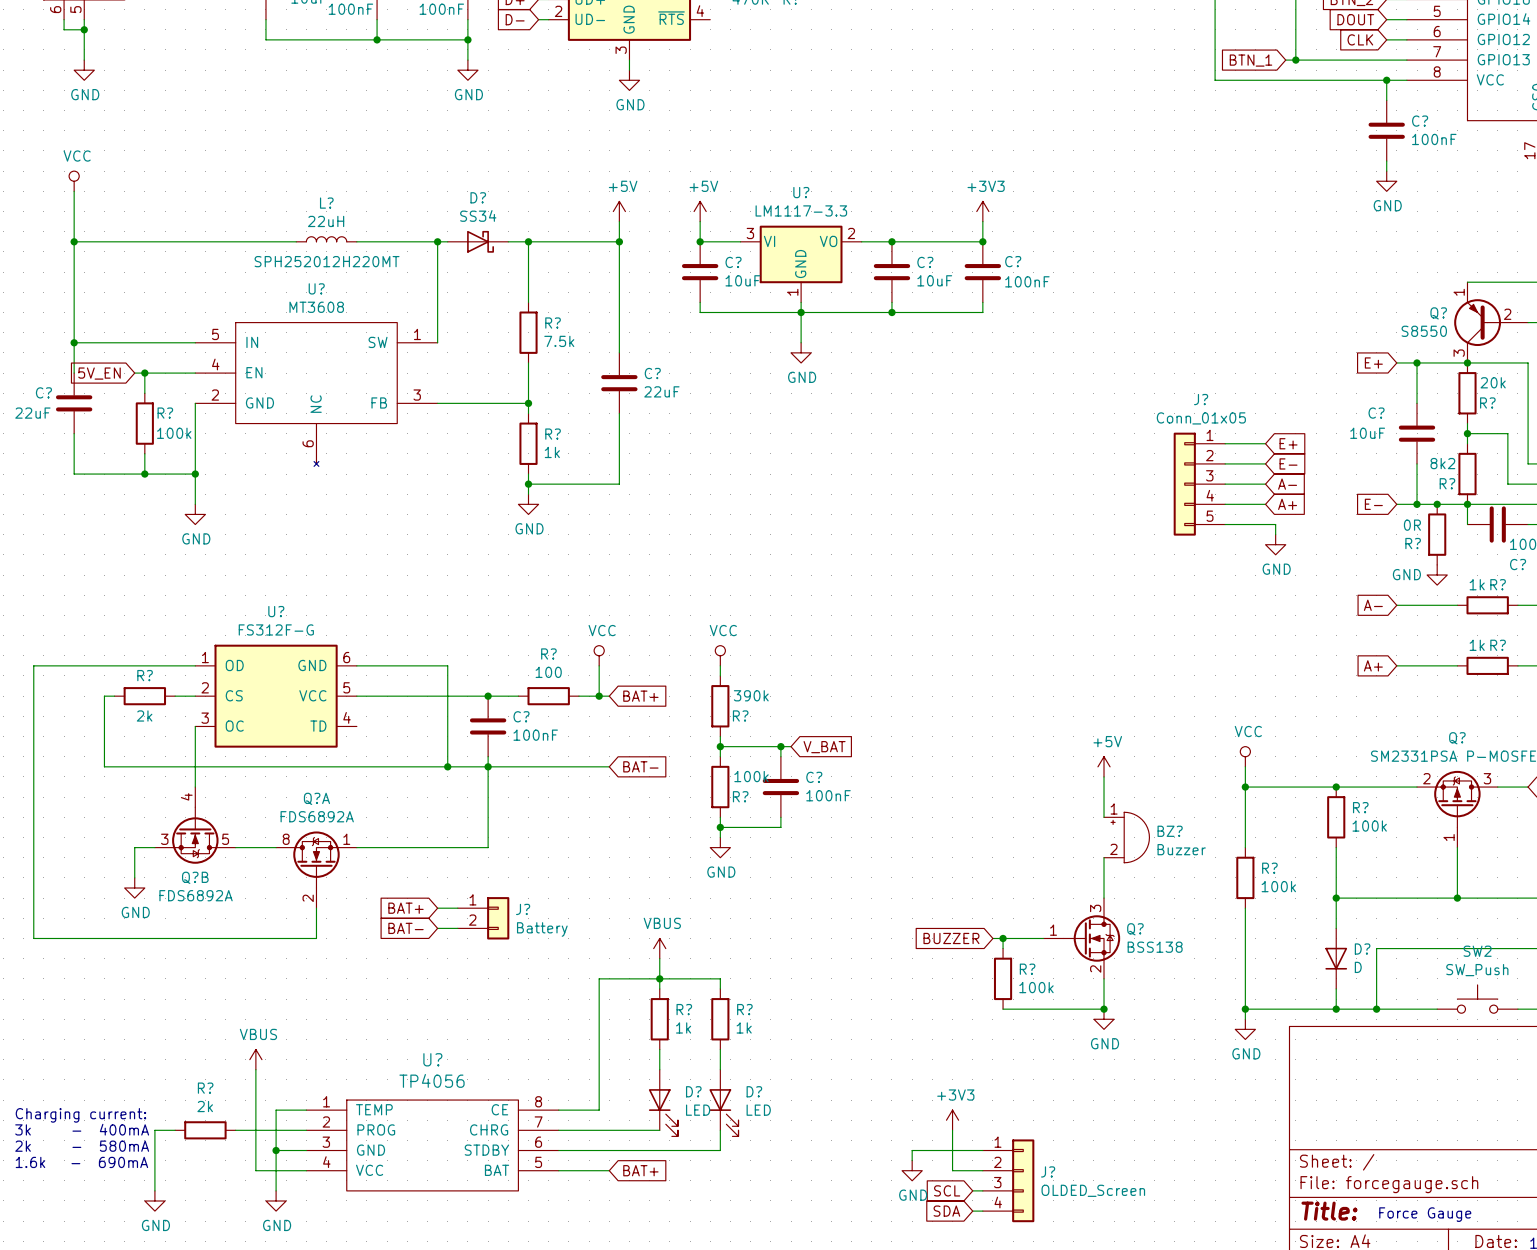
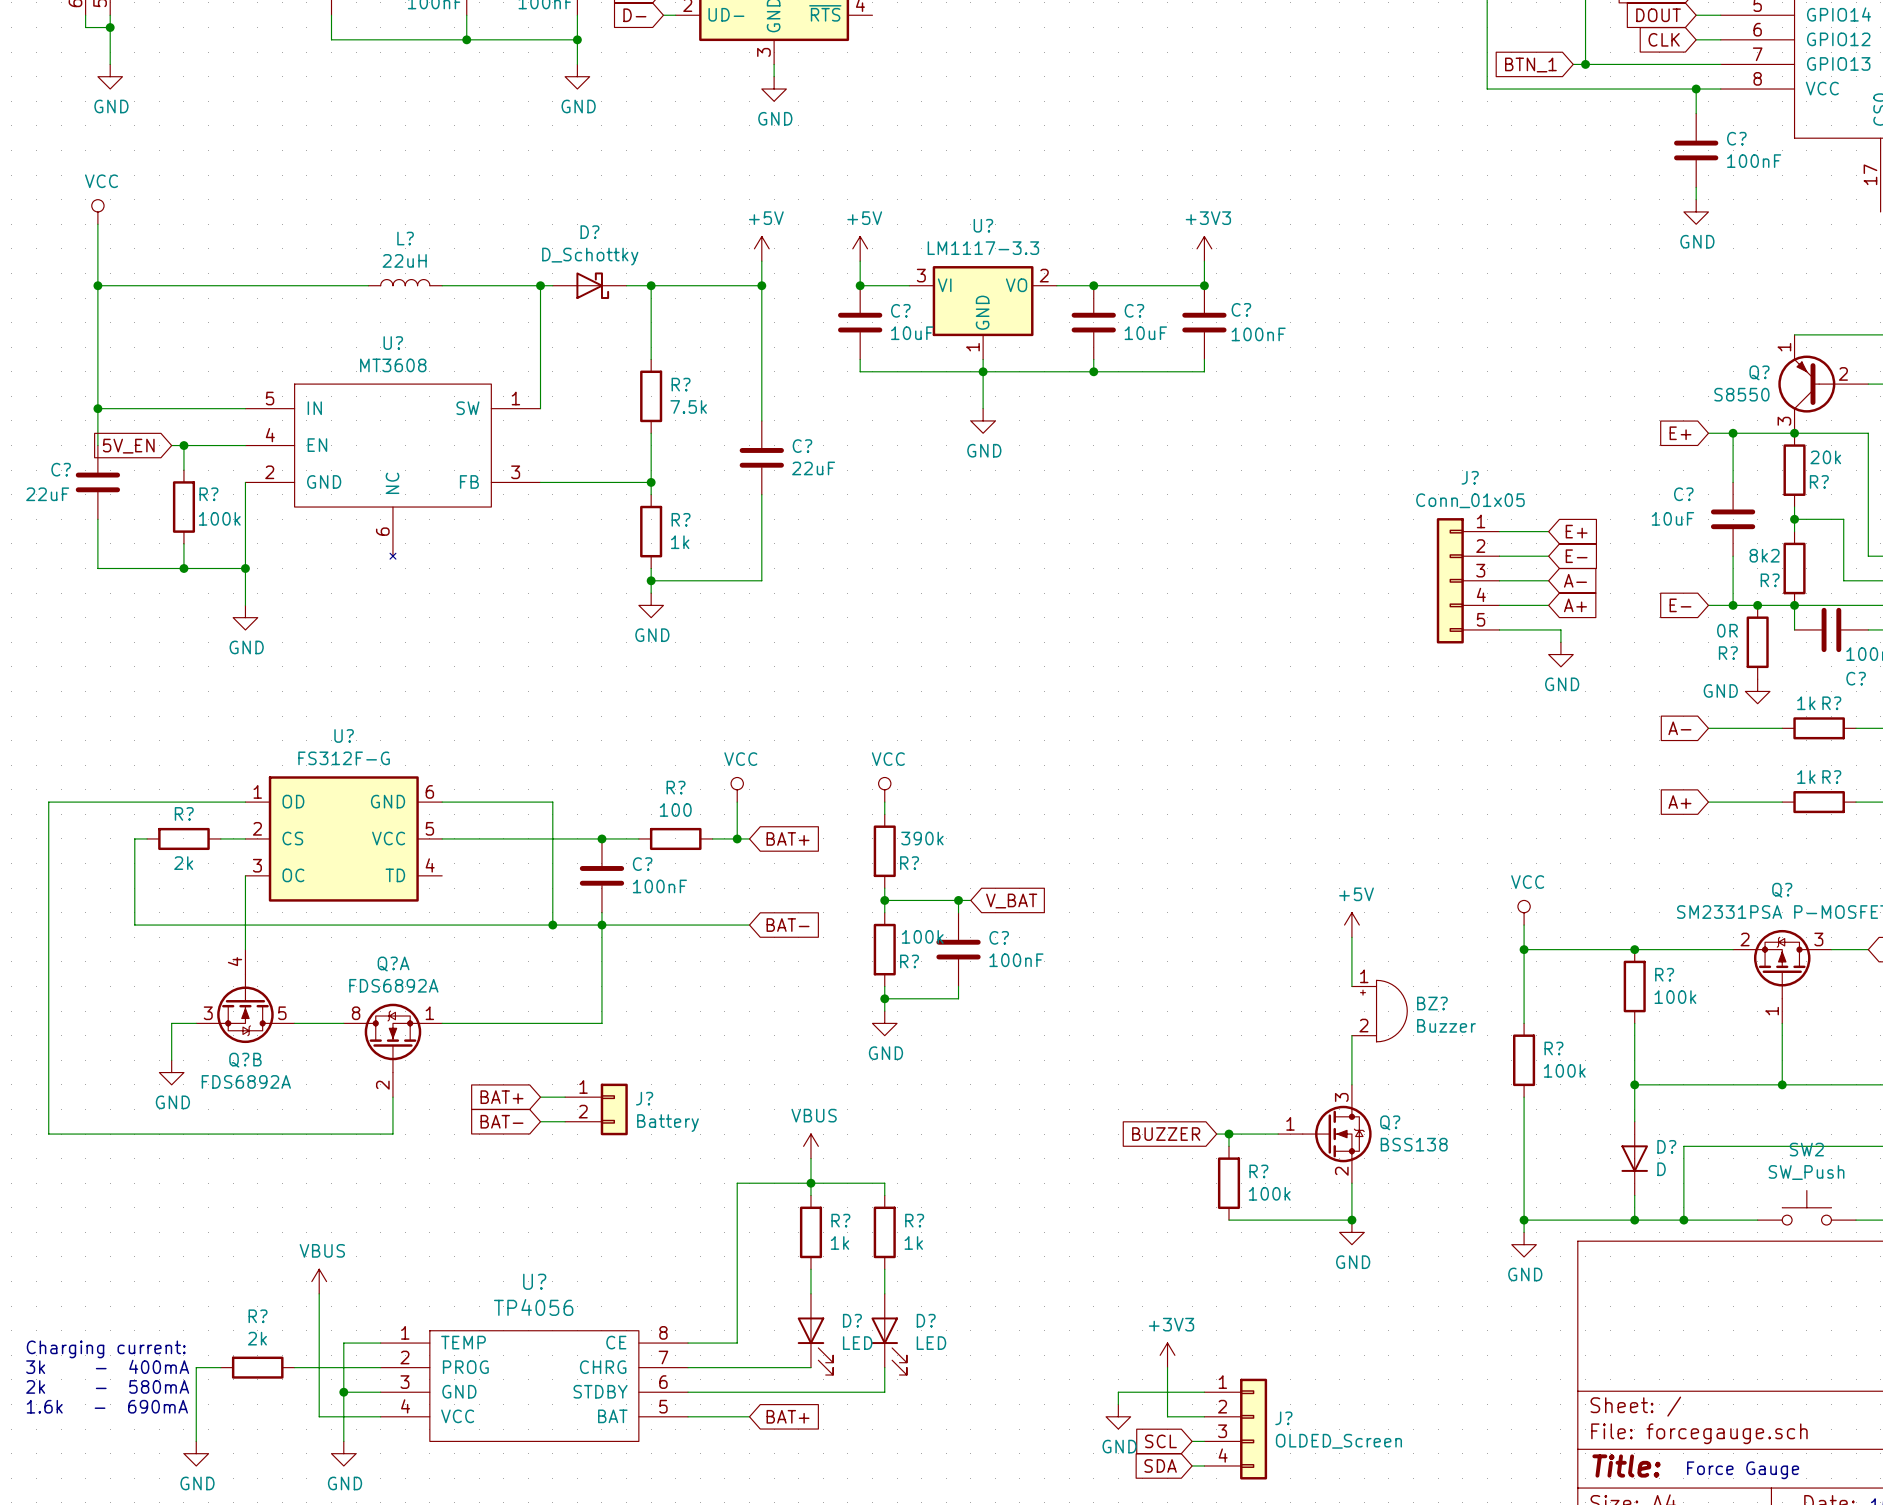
D? value: SS34 (478, 215) -> D_Schottky (590, 256)
L? text: SPH252012H220MT (327, 261) -> none

